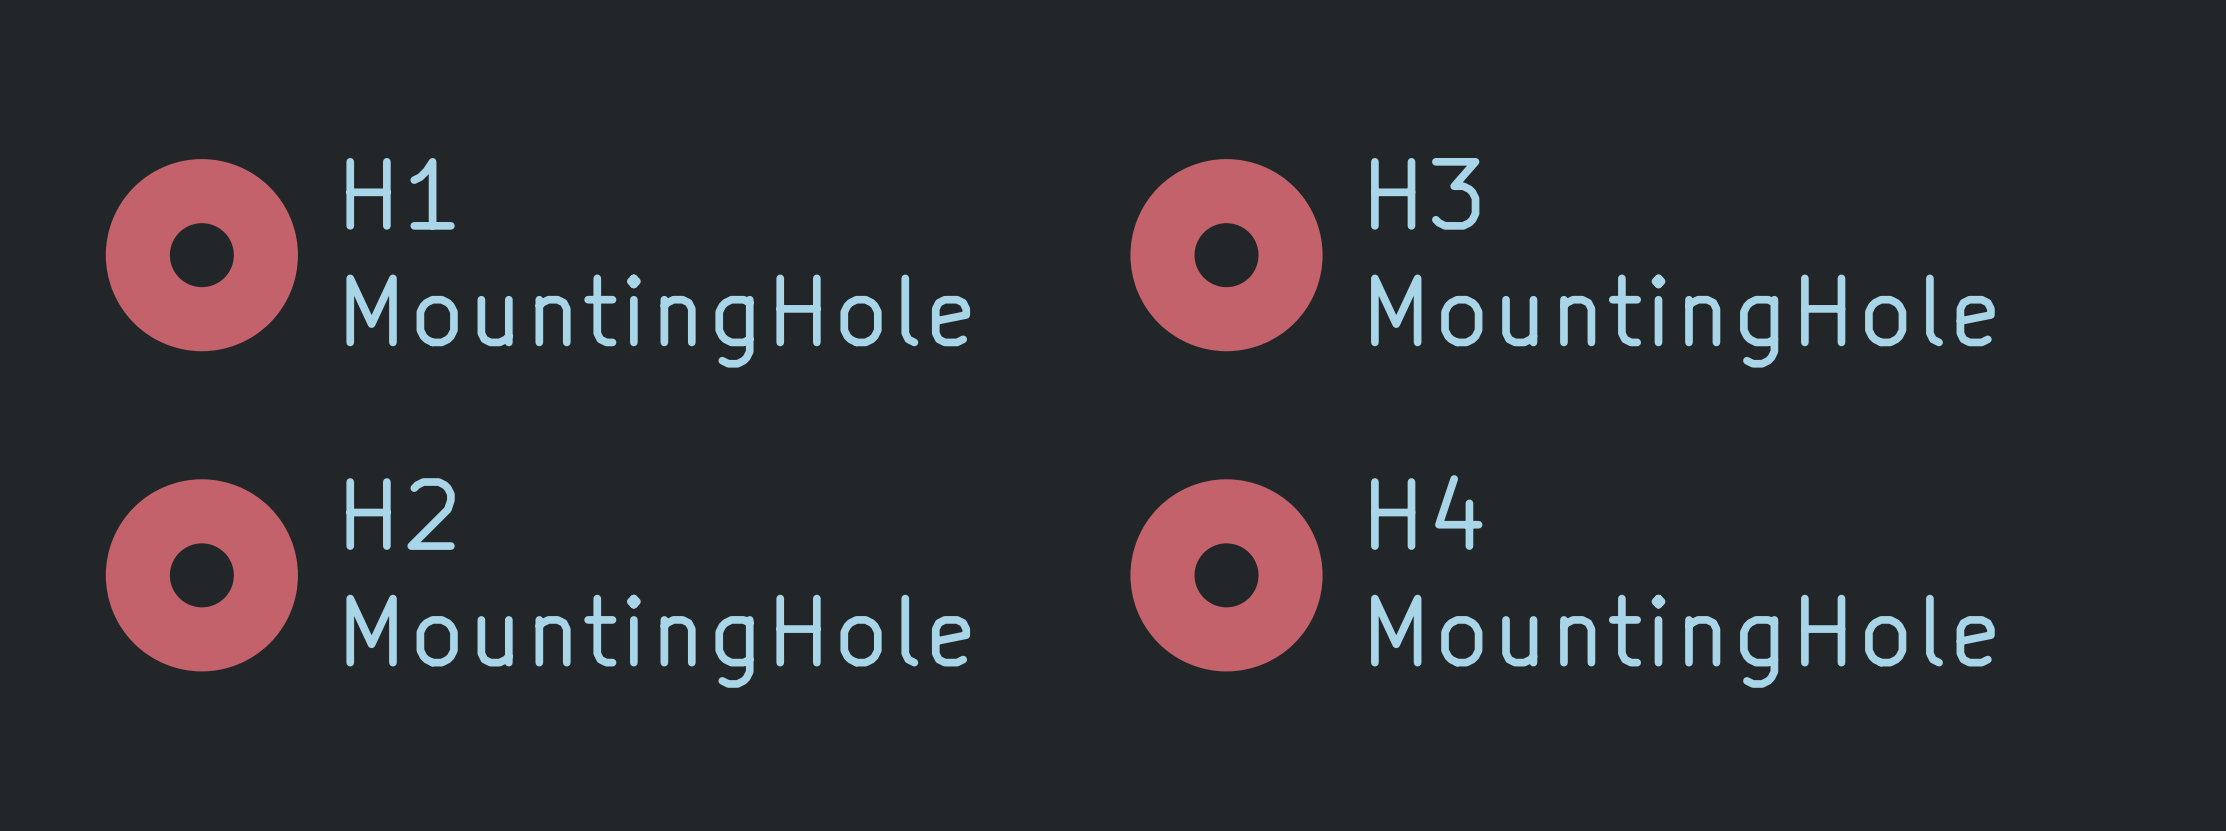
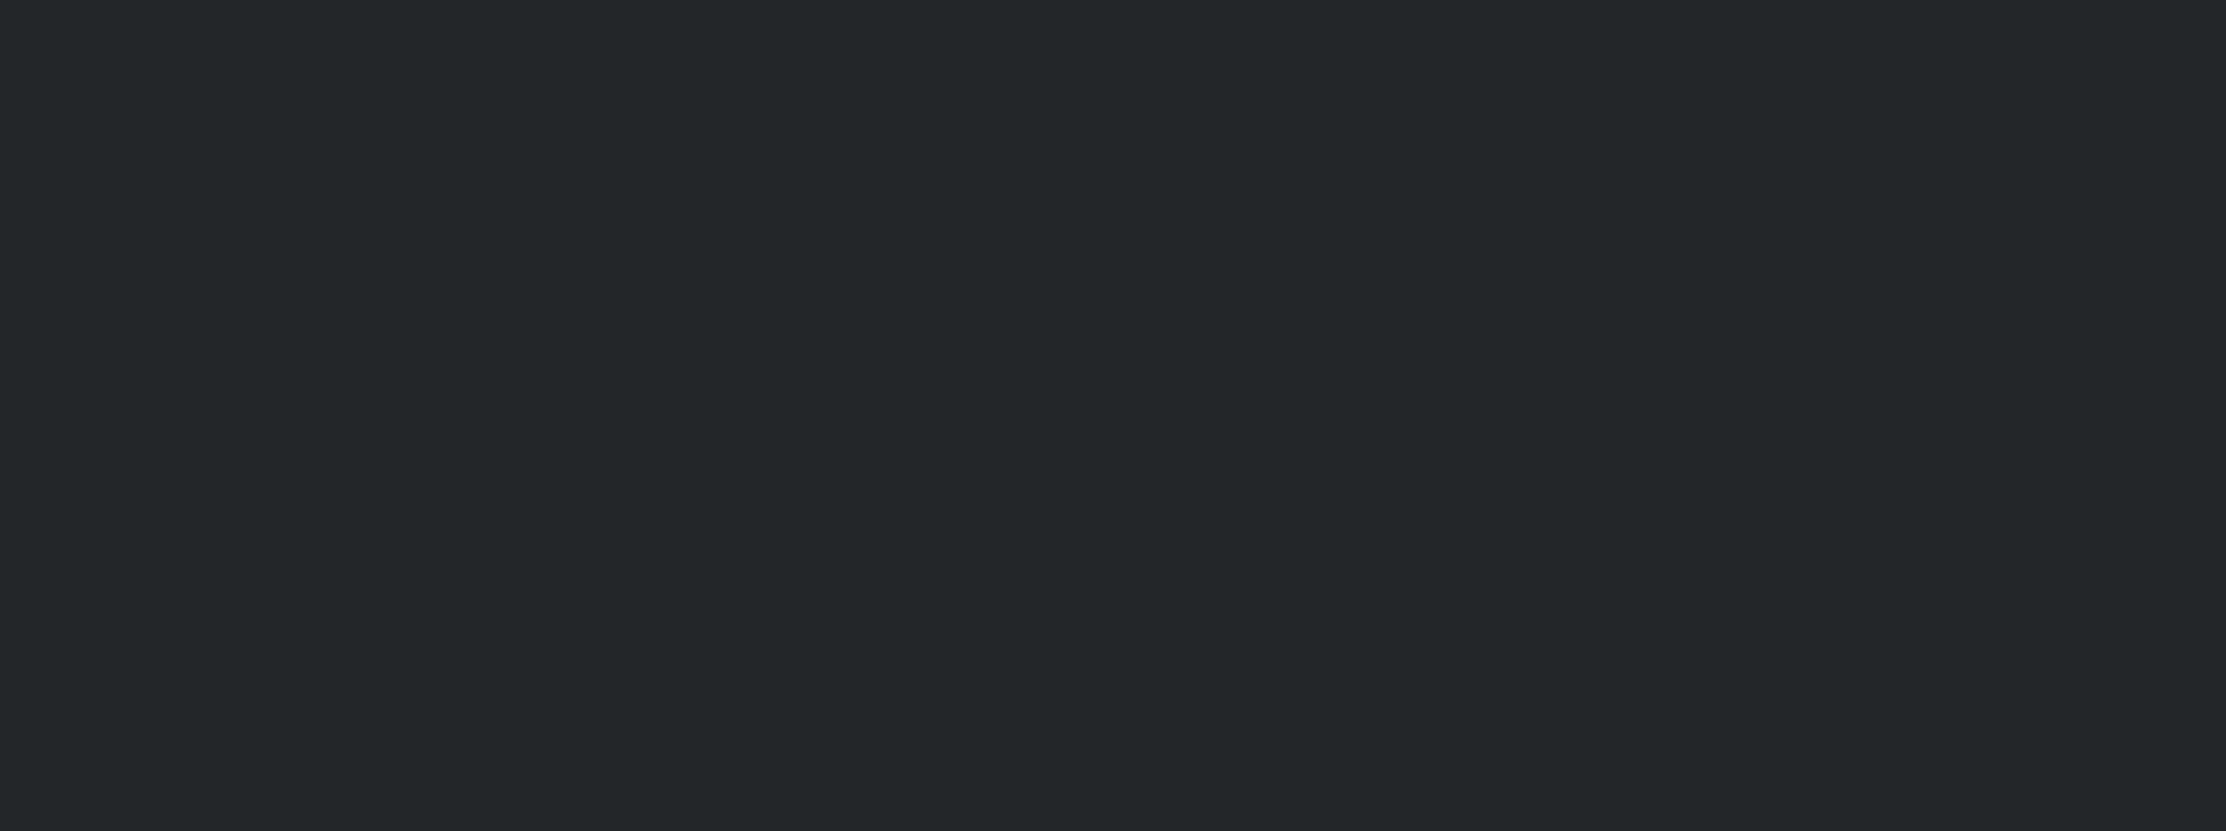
H1: MountingHole (201, 255) -> none
H3: MountingHole (1226, 255) -> none
H2: MountingHole (201, 575) -> none
H4: MountingHole (1226, 575) -> none

